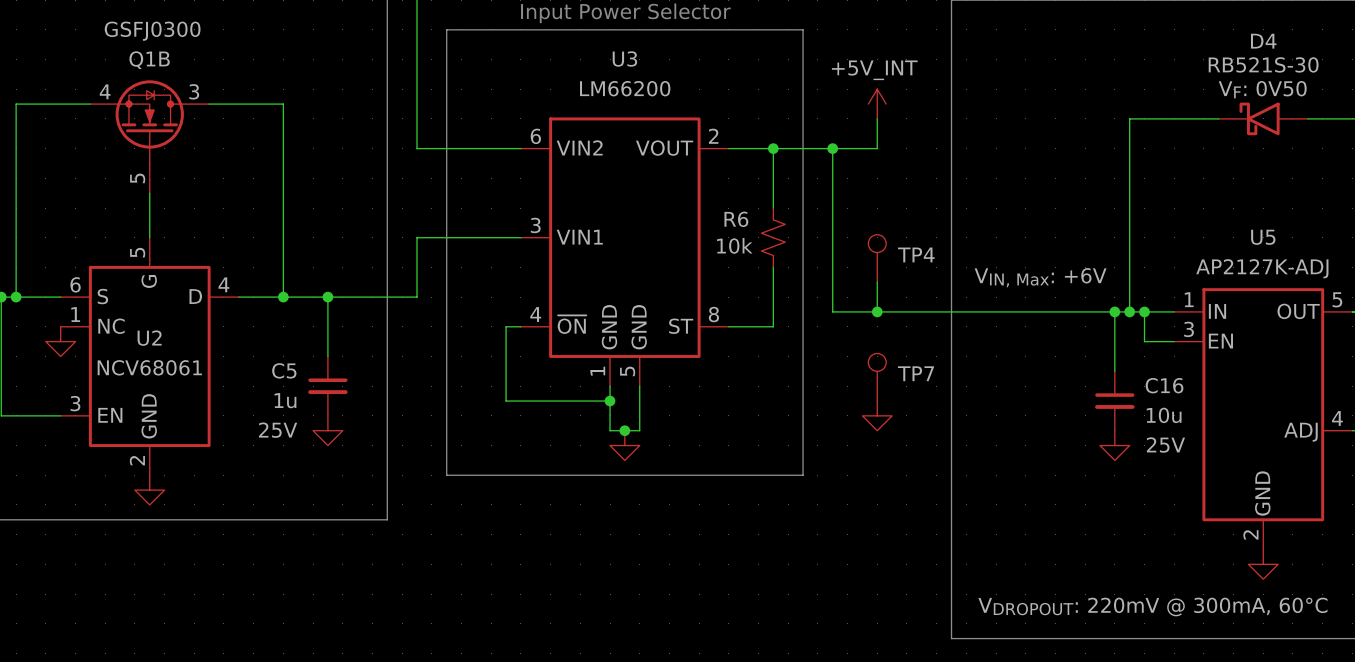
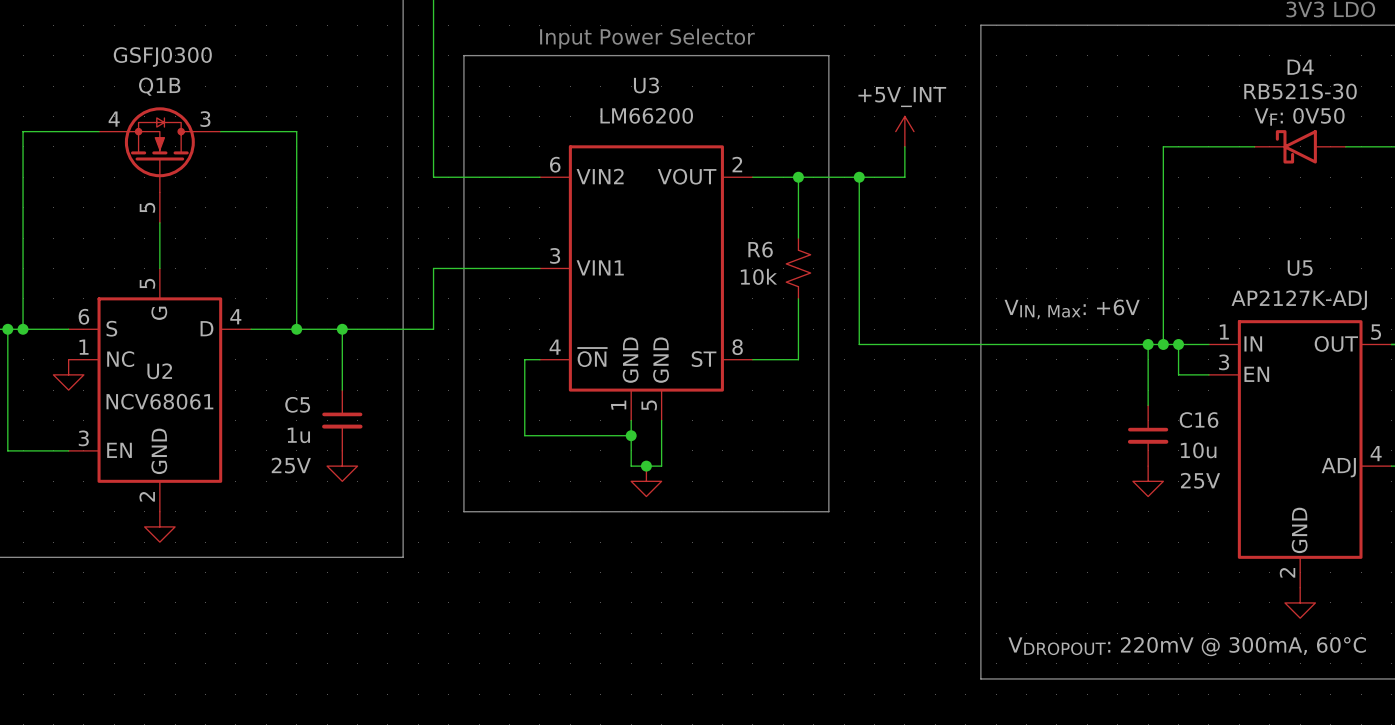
TP4: (877, 258) -> none
wire: (877, 282) (877, 311) -> none
junction: (877, 311) -> none
TP7: (877, 377) -> none
power symbol: (877, 415) -> none

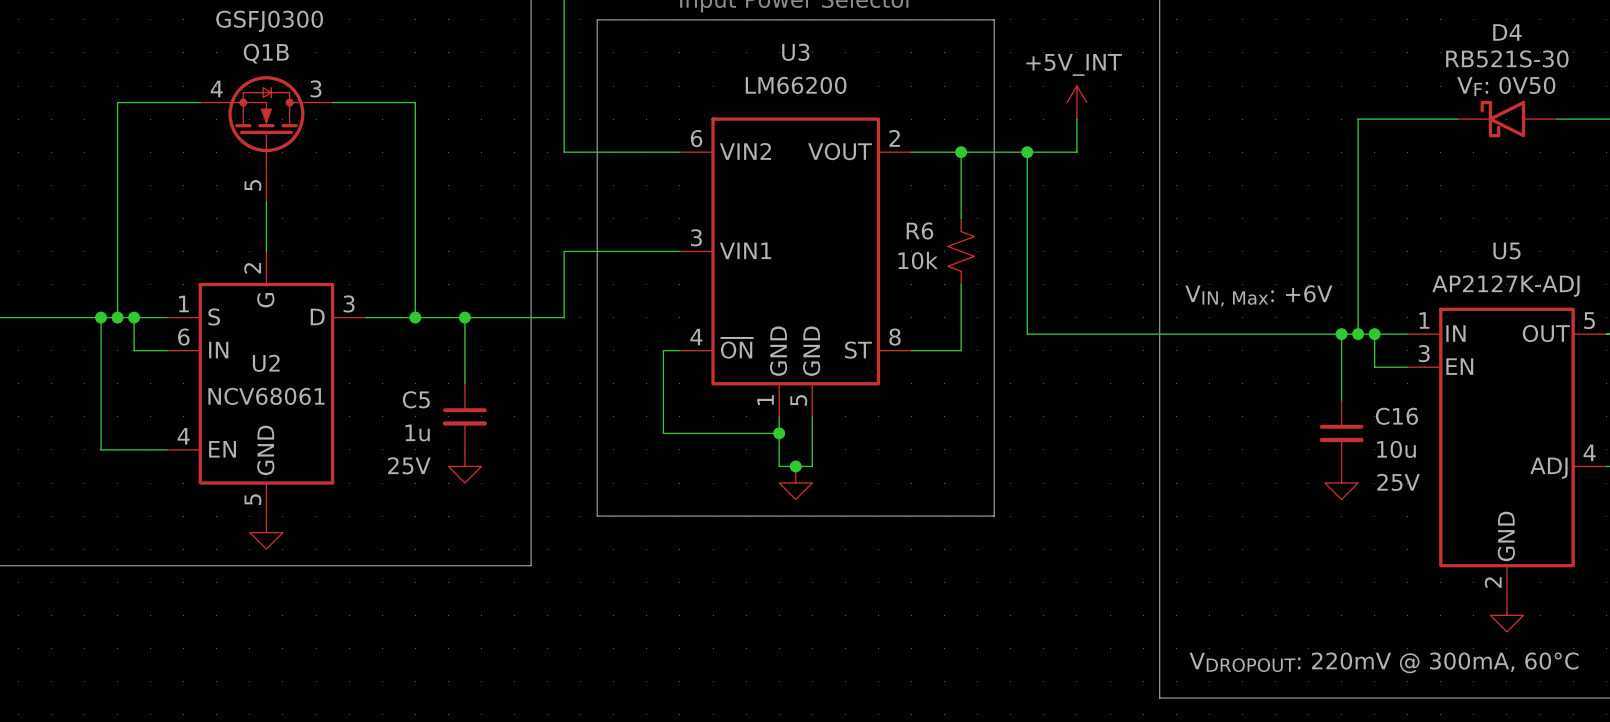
U2 pin number: 5 (147, 283) -> 2 (252, 268)
U2 pin number: 6 (83, 316) -> 1 (183, 303)
U2 pin number: 4 (235, 316) -> 3 (349, 303)
wire: none -> (134, 317) (134, 350) (167, 350)
junction: none -> (134, 317)
U2 pin number: 1 (84, 347) -> 6 (183, 337)
U2 pin name: NC (120, 359) -> IN (218, 350)
power symbol: (68, 374) -> none
U2 pin number: 3 (83, 438) -> 4 (183, 436)
U2 pin number: 2 (147, 496) -> 5 (252, 499)

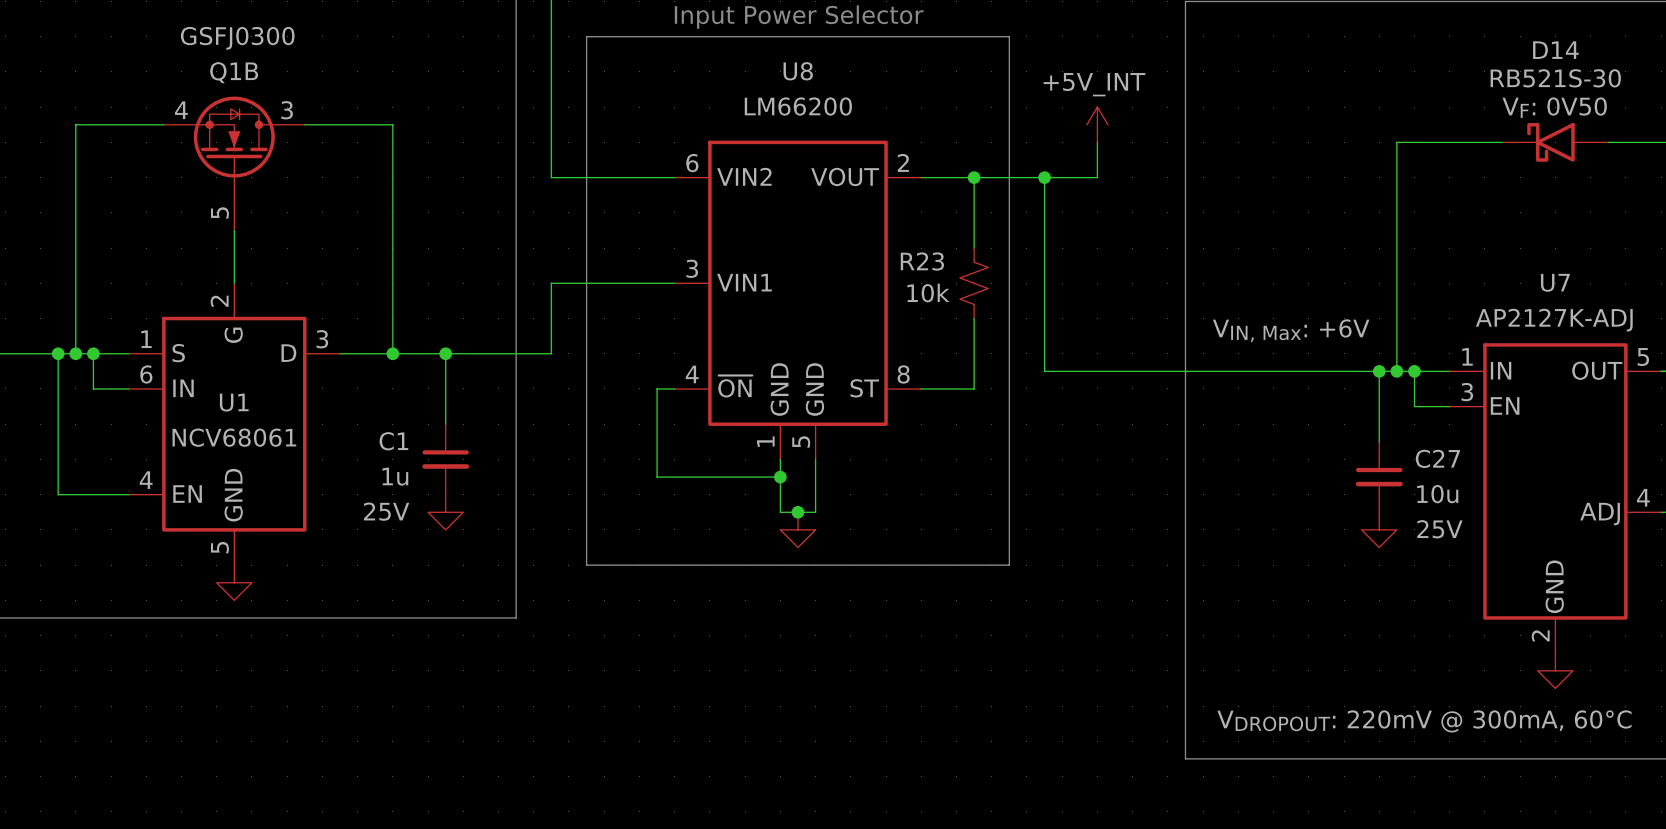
D4 name: D4 (1507, 32) -> D14 (1555, 50)
U3 name: U3 (795, 52) -> U8 (798, 71)
R6 name: R6 (919, 230) -> R23 (922, 261)
U5 name: U5 (1506, 250) -> U7 (1555, 282)
U2 name: U2 (266, 363) -> U1 (234, 402)
C5 name: C5 (416, 399) -> C1 (393, 441)
C16 name: C16 (1396, 416) -> C27 (1437, 458)

